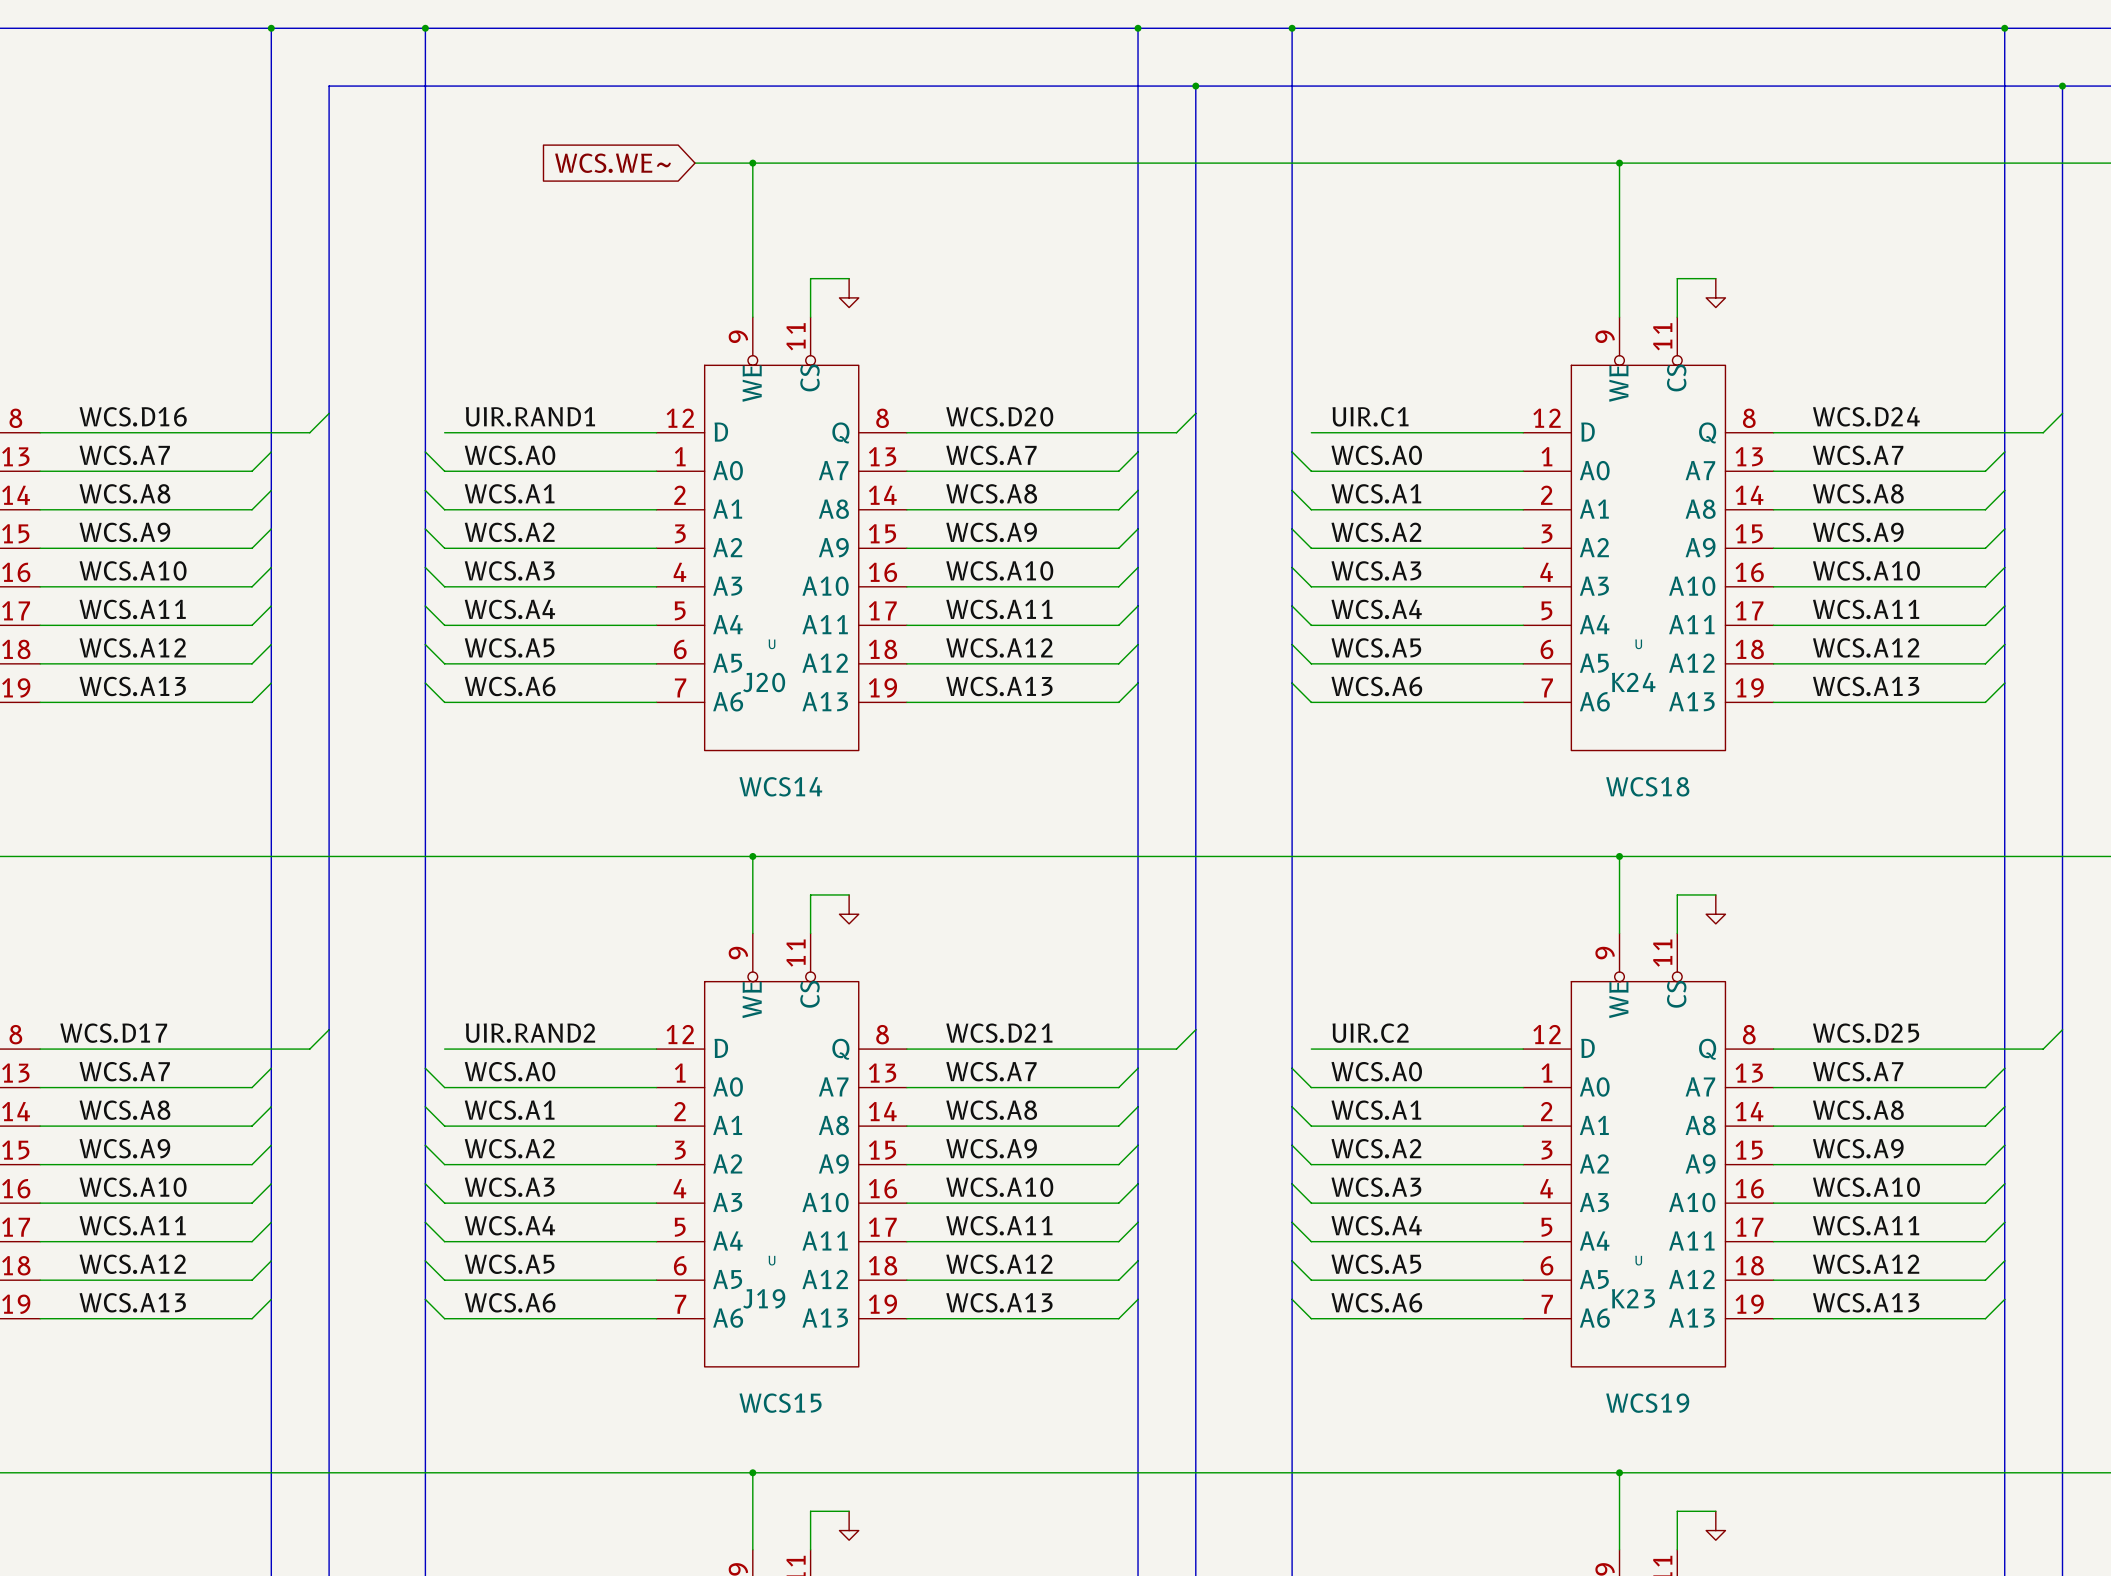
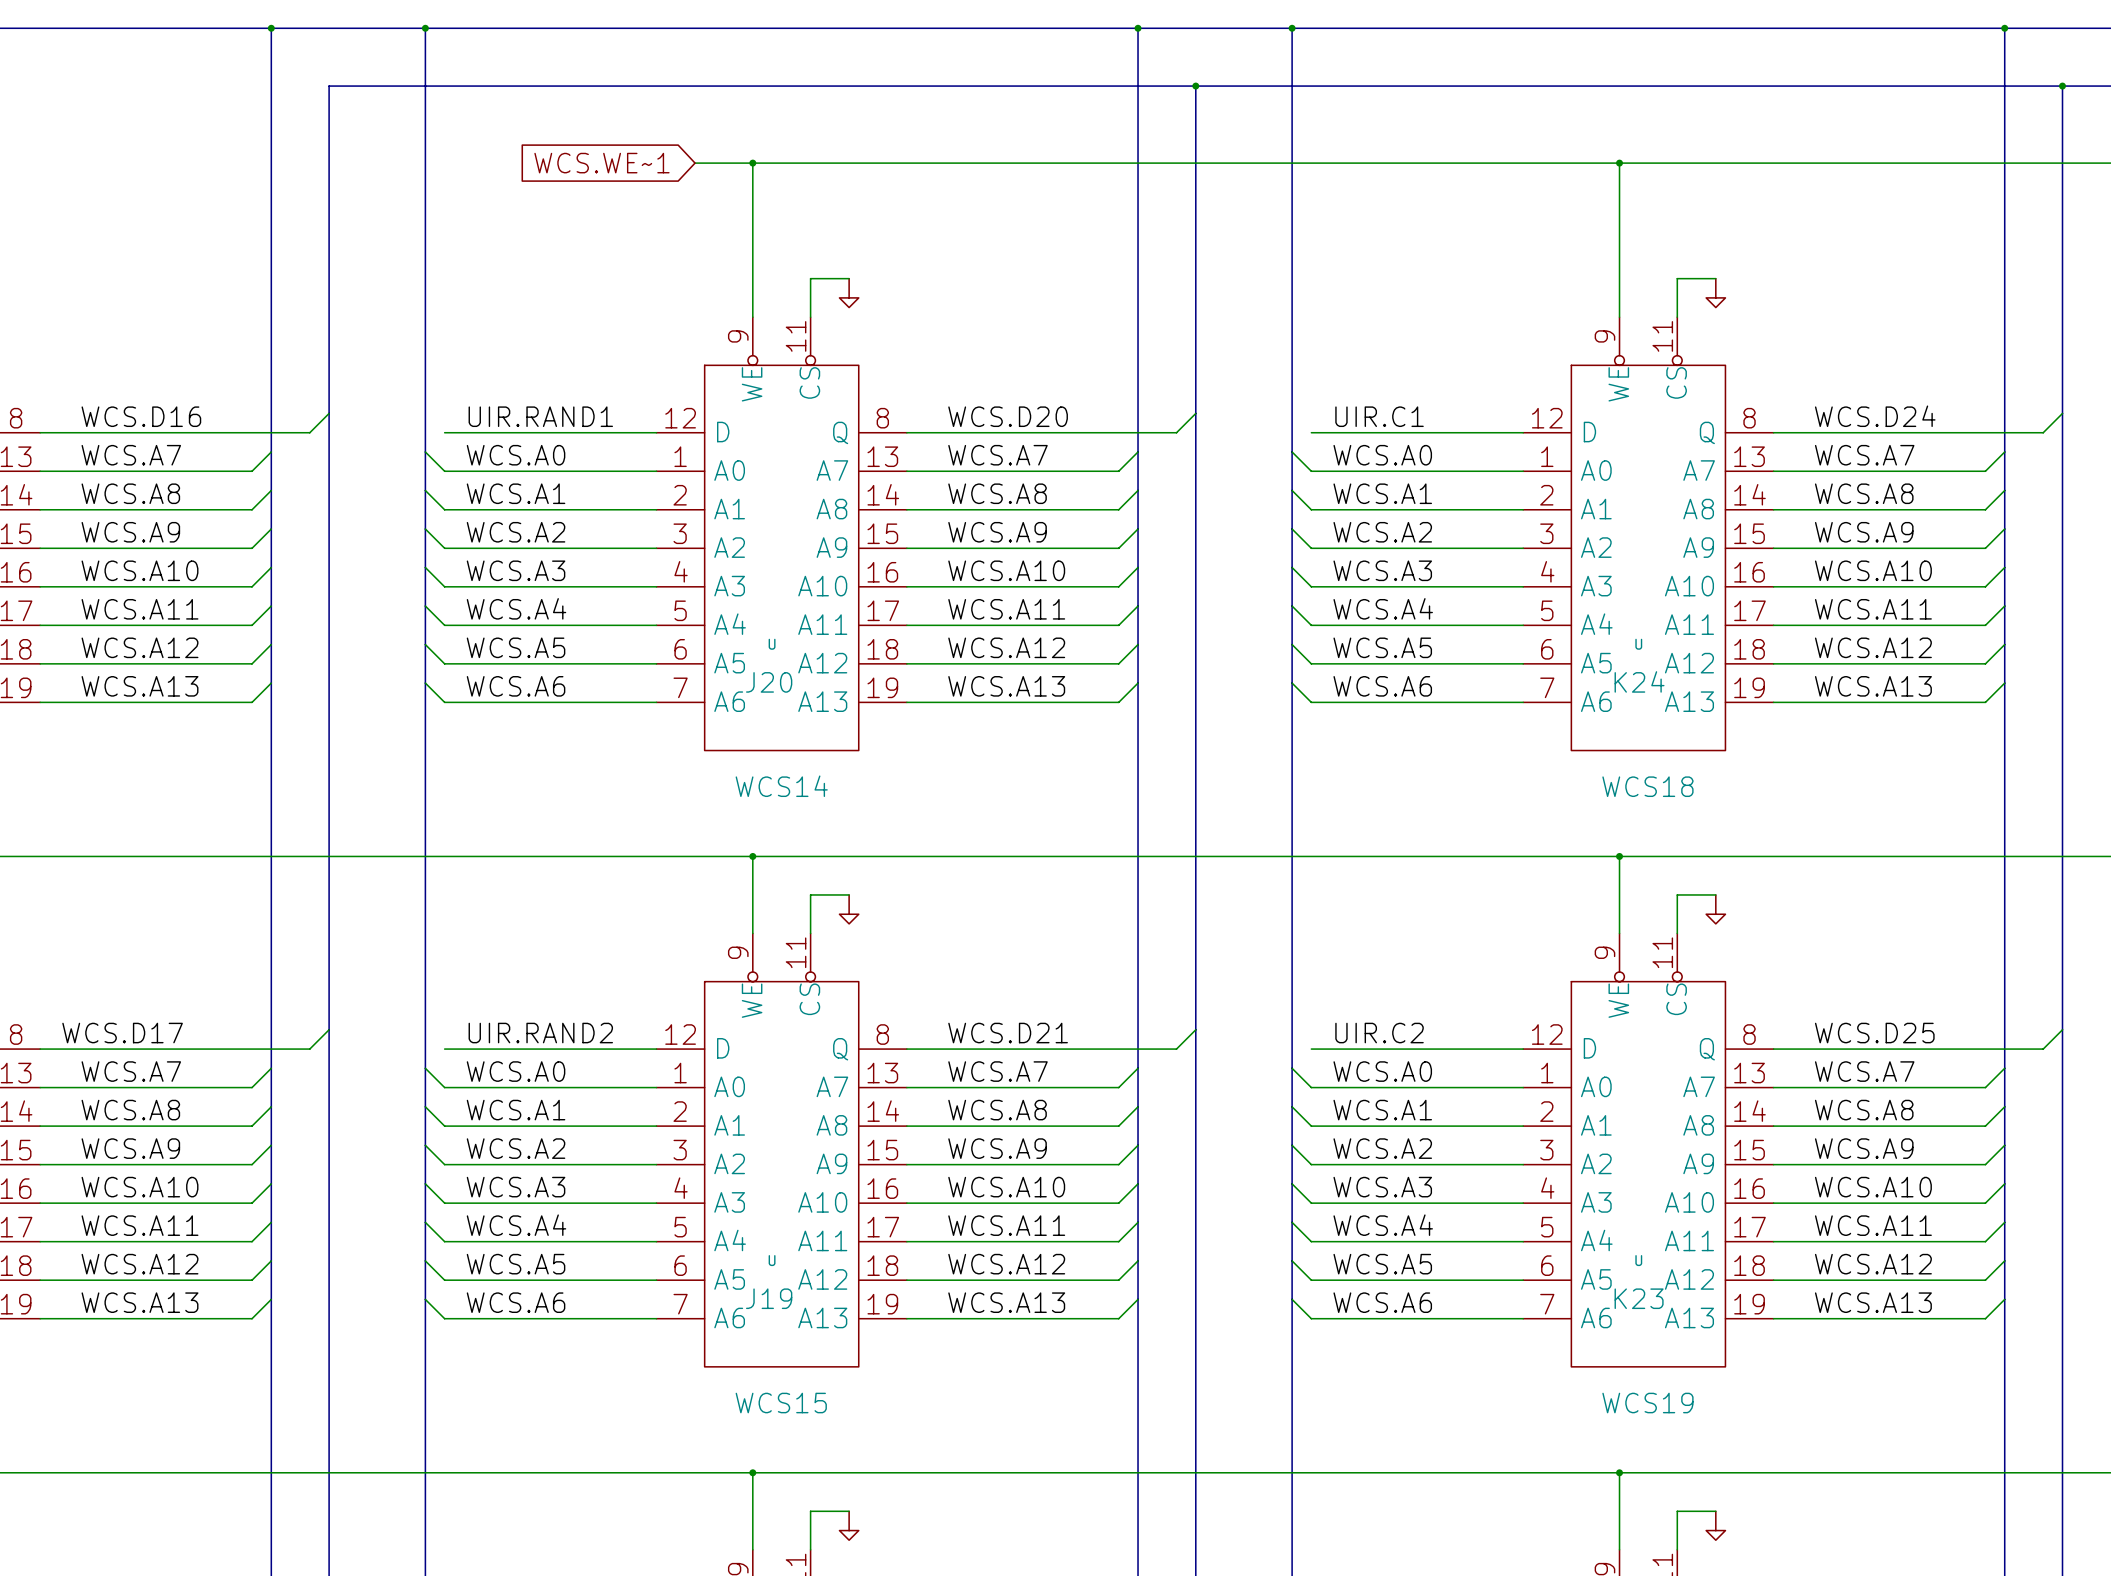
global label: WCS.WE~ (613, 163) -> WCS.WE~1 (601, 163)

